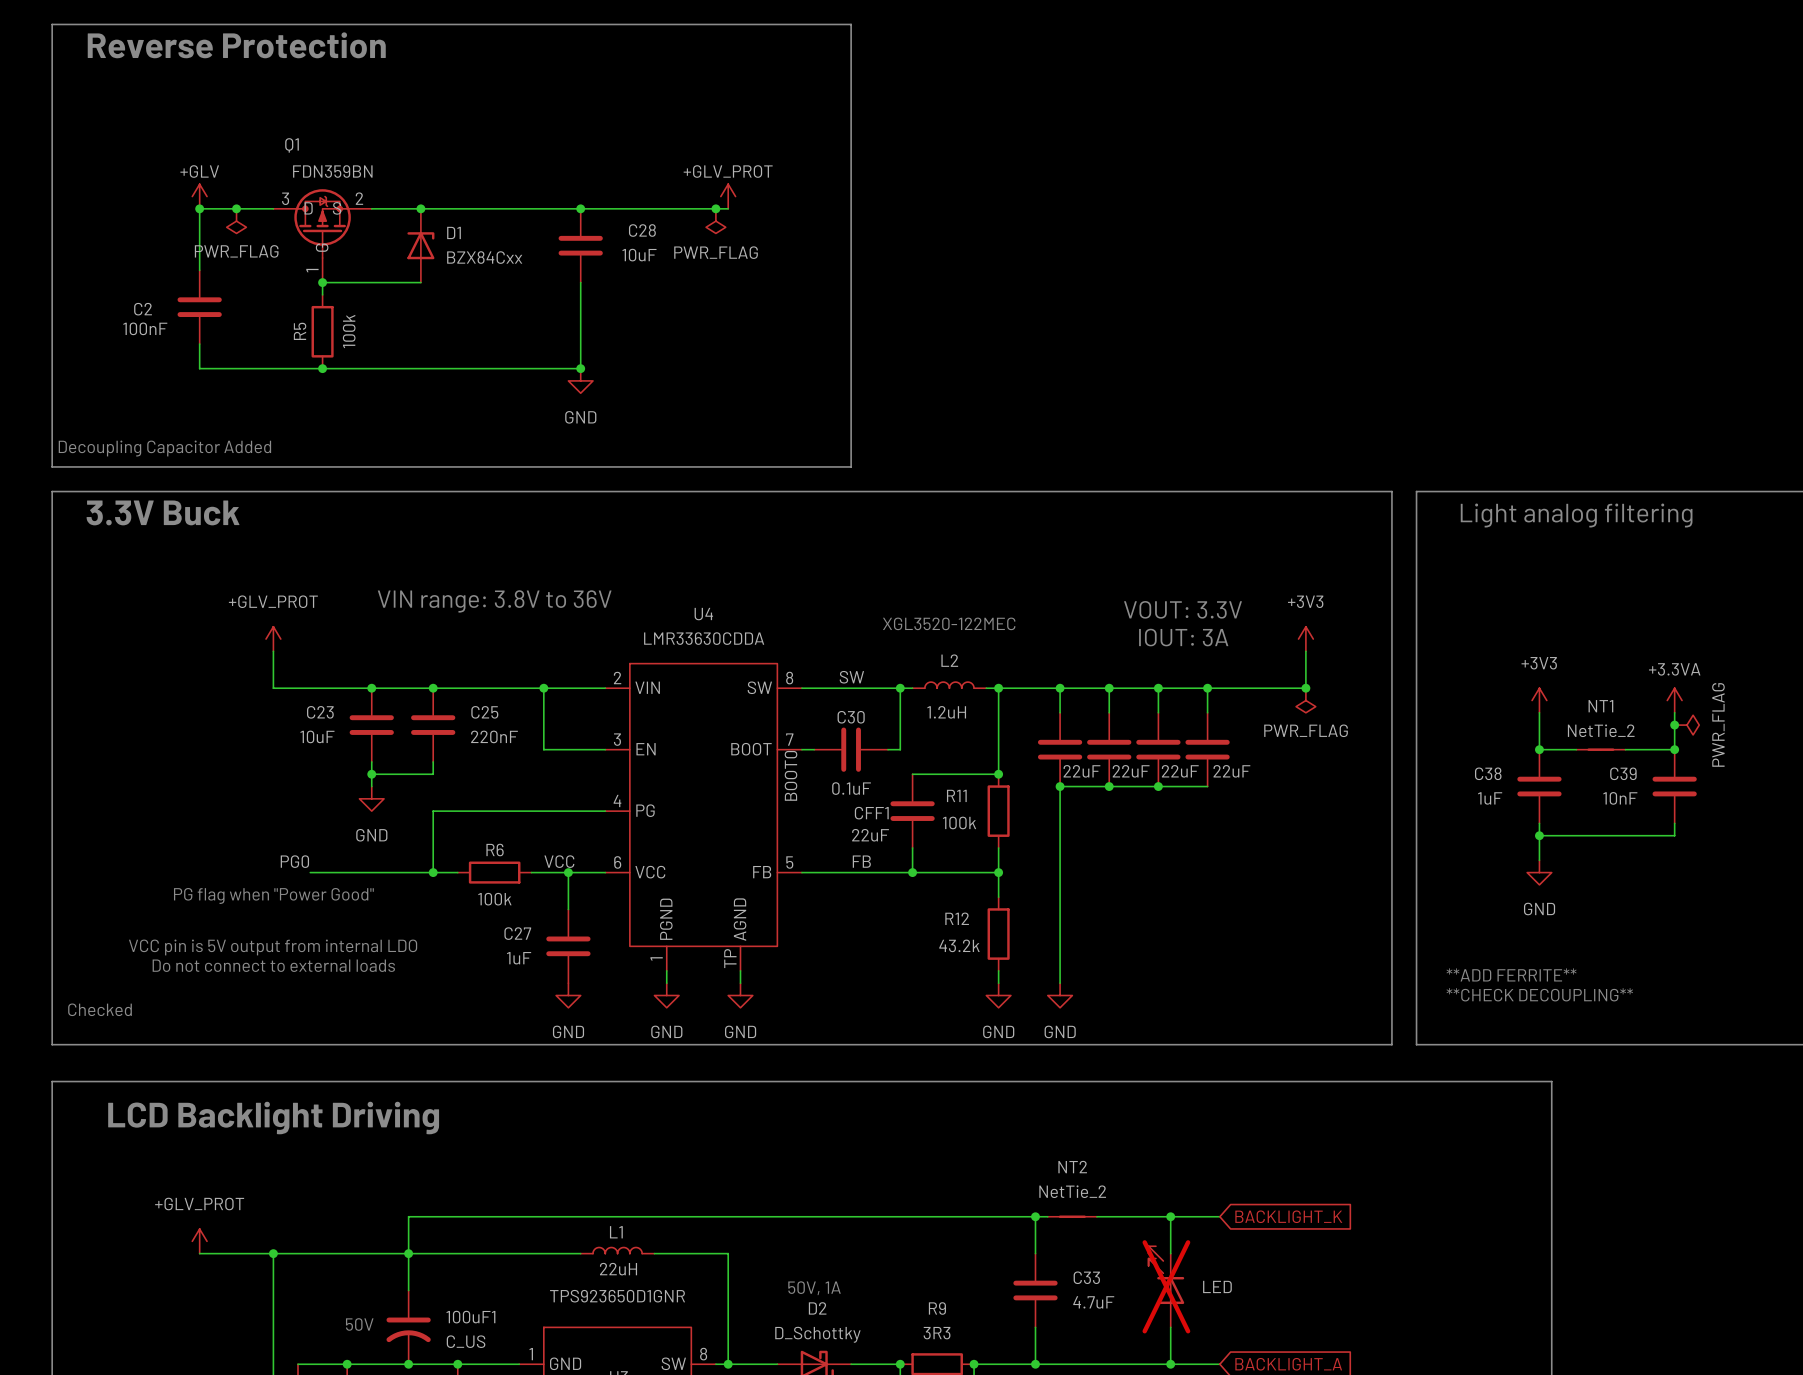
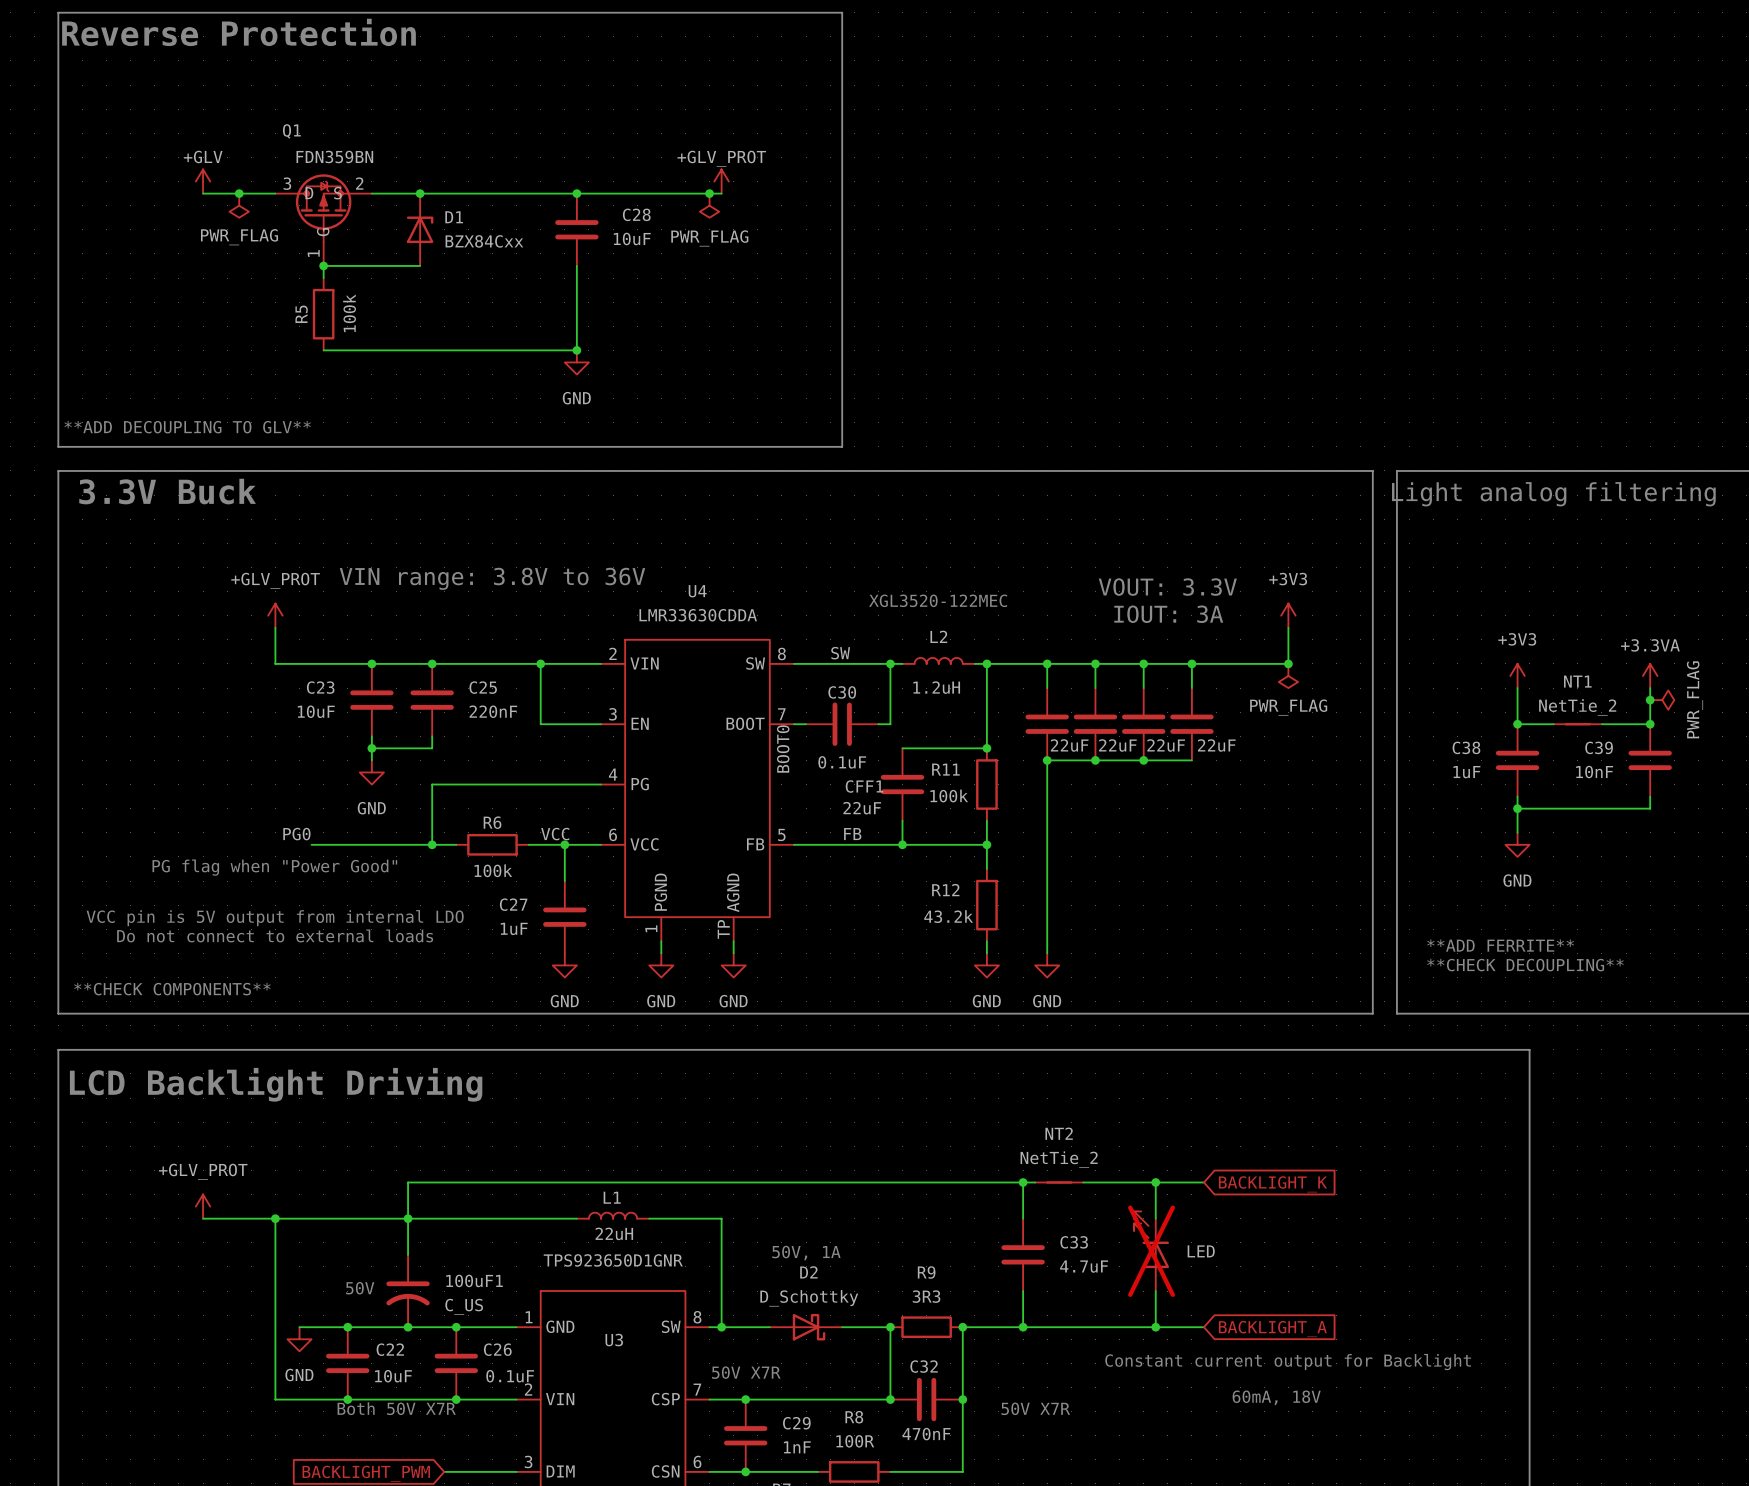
wire: (199, 208) (199, 270) -> none
junction: (199, 208) -> none
C2: 100nF (199, 307) -> none
wire: (199, 344) (199, 368) (322, 368) -> none
junction: (322, 368) -> none
text: Decoupling Capacitor Added (164, 448) -> **ADD DECOUPLING TO GLV** (187, 427)
text: Checked (100, 1009) -> none
text: none -> **CHECK COMPONENTS** (172, 989)

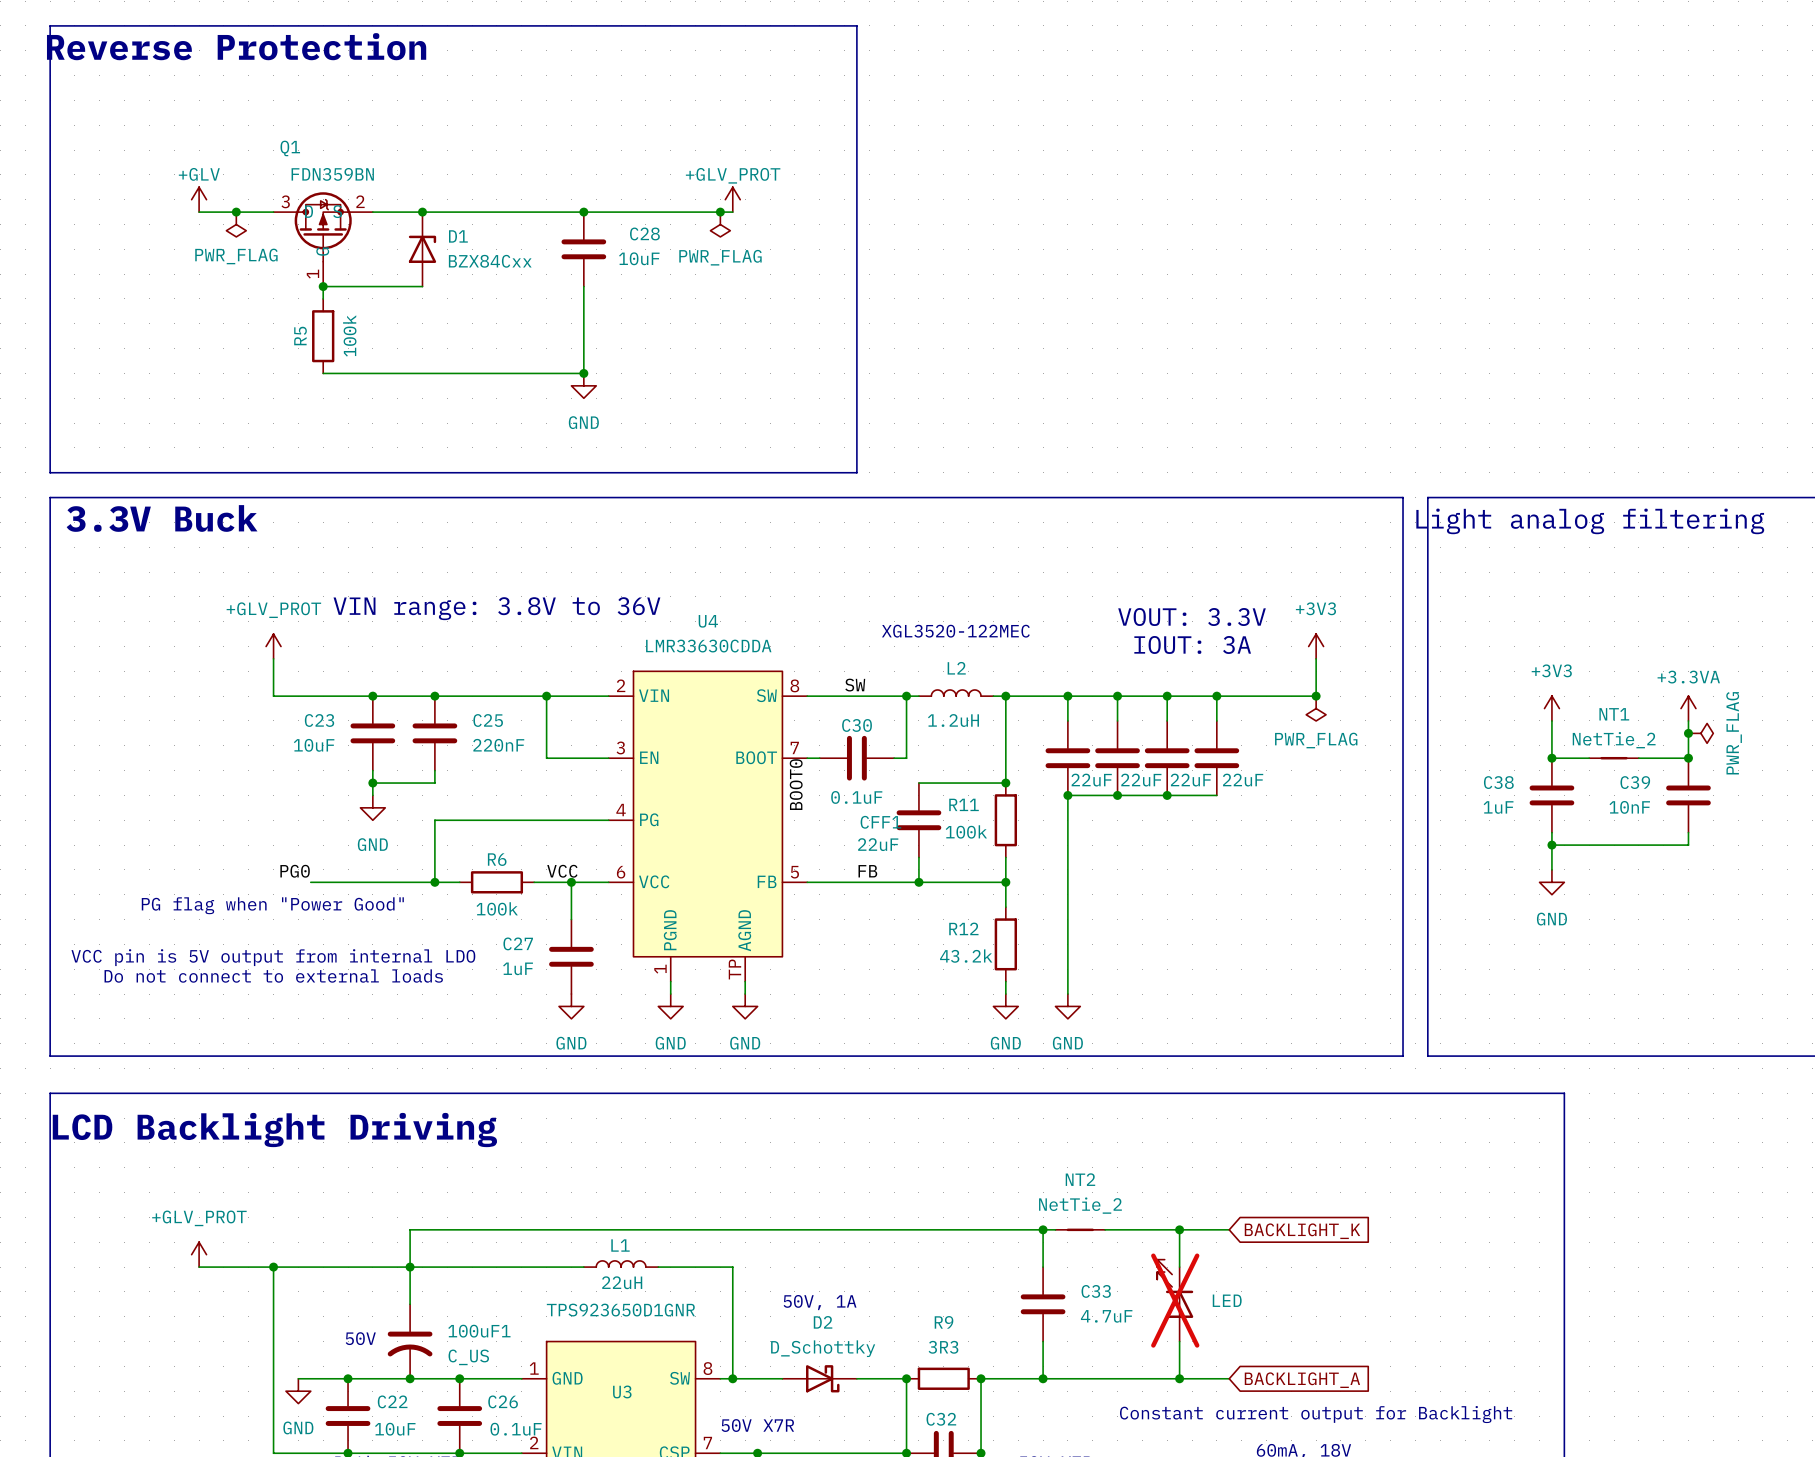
text: **ADD DECOUPLING TO GLV** (187, 427) -> none
text: **ADD FERRITE** (1500, 945) -> none
text: **CHECK DECOUPLING** (1525, 965) -> none
text: **CHECK COMPONENTS** (172, 989) -> none

